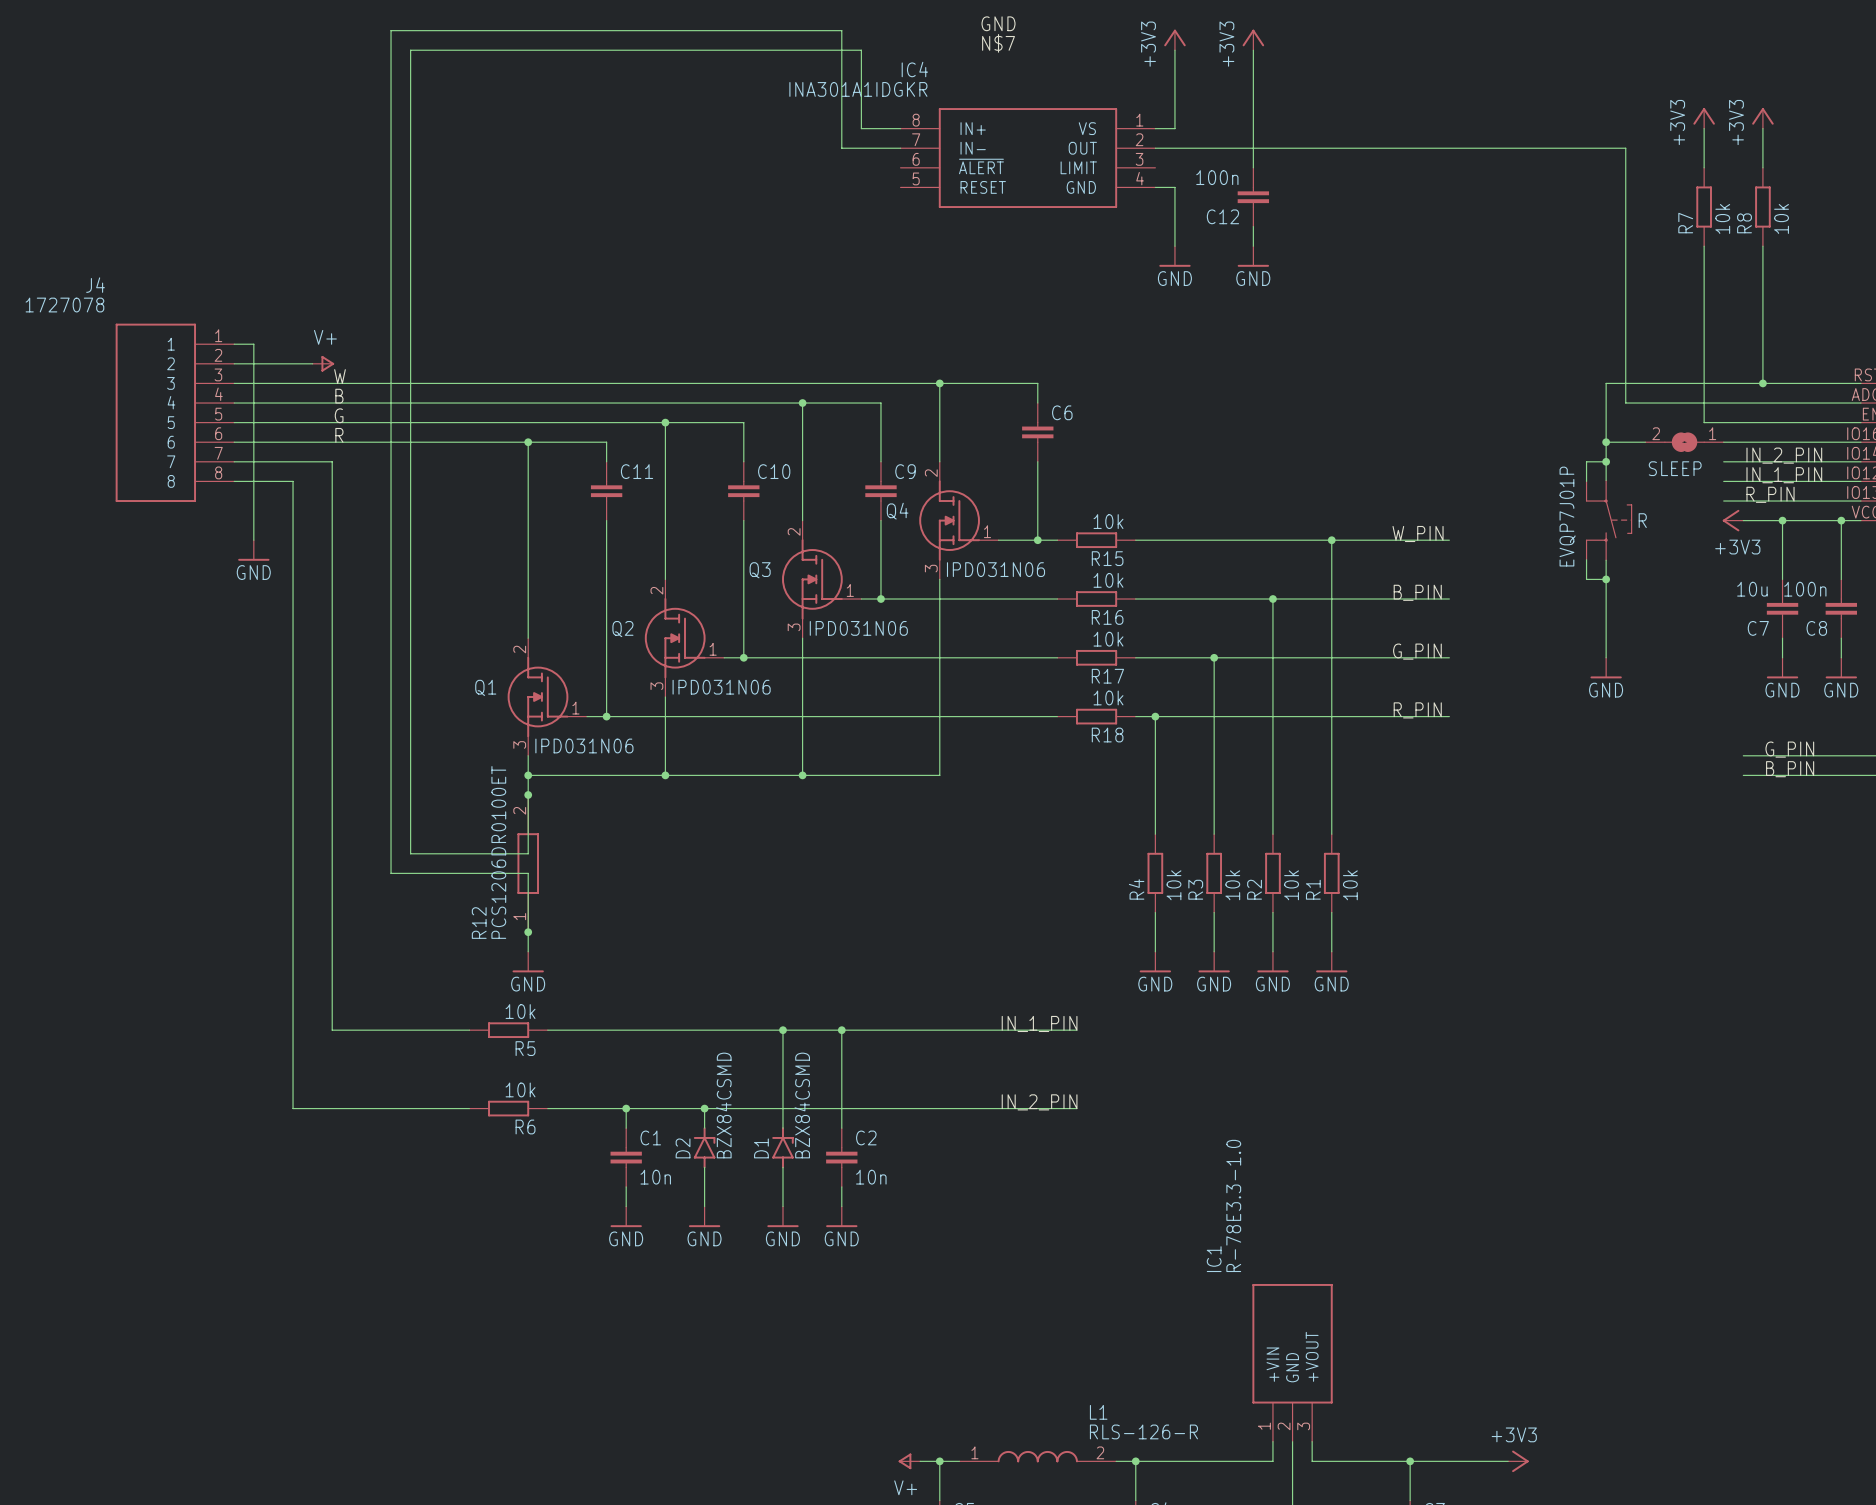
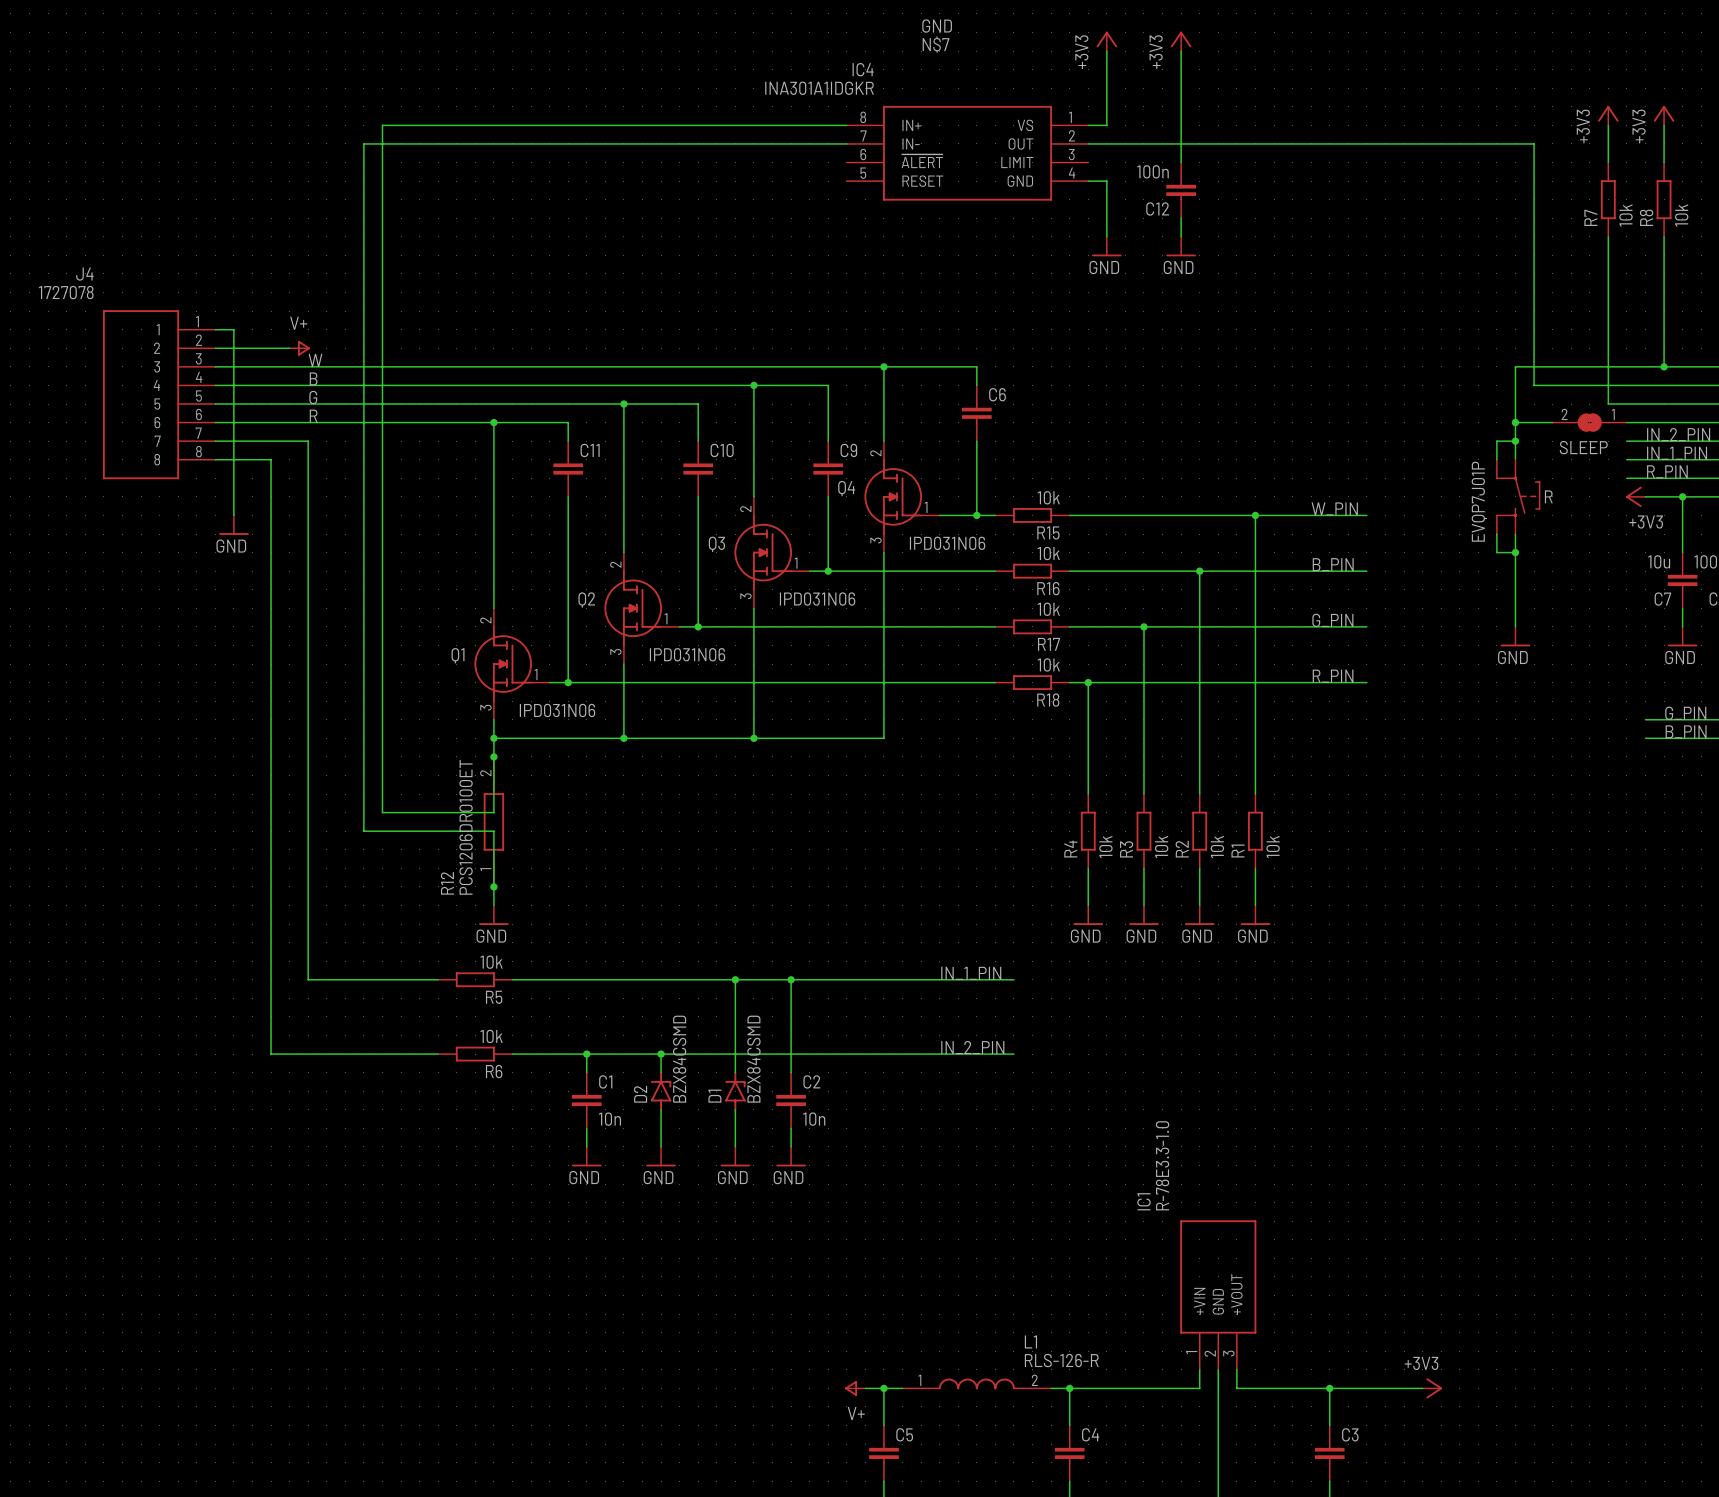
wire: (410, 128) (410, 50) (861, 50) (861, 128) -> (382, 125) (809, 125)
wire: (391, 148) (391, 30) (841, 30) (841, 148) -> (363, 143) (791, 143)

